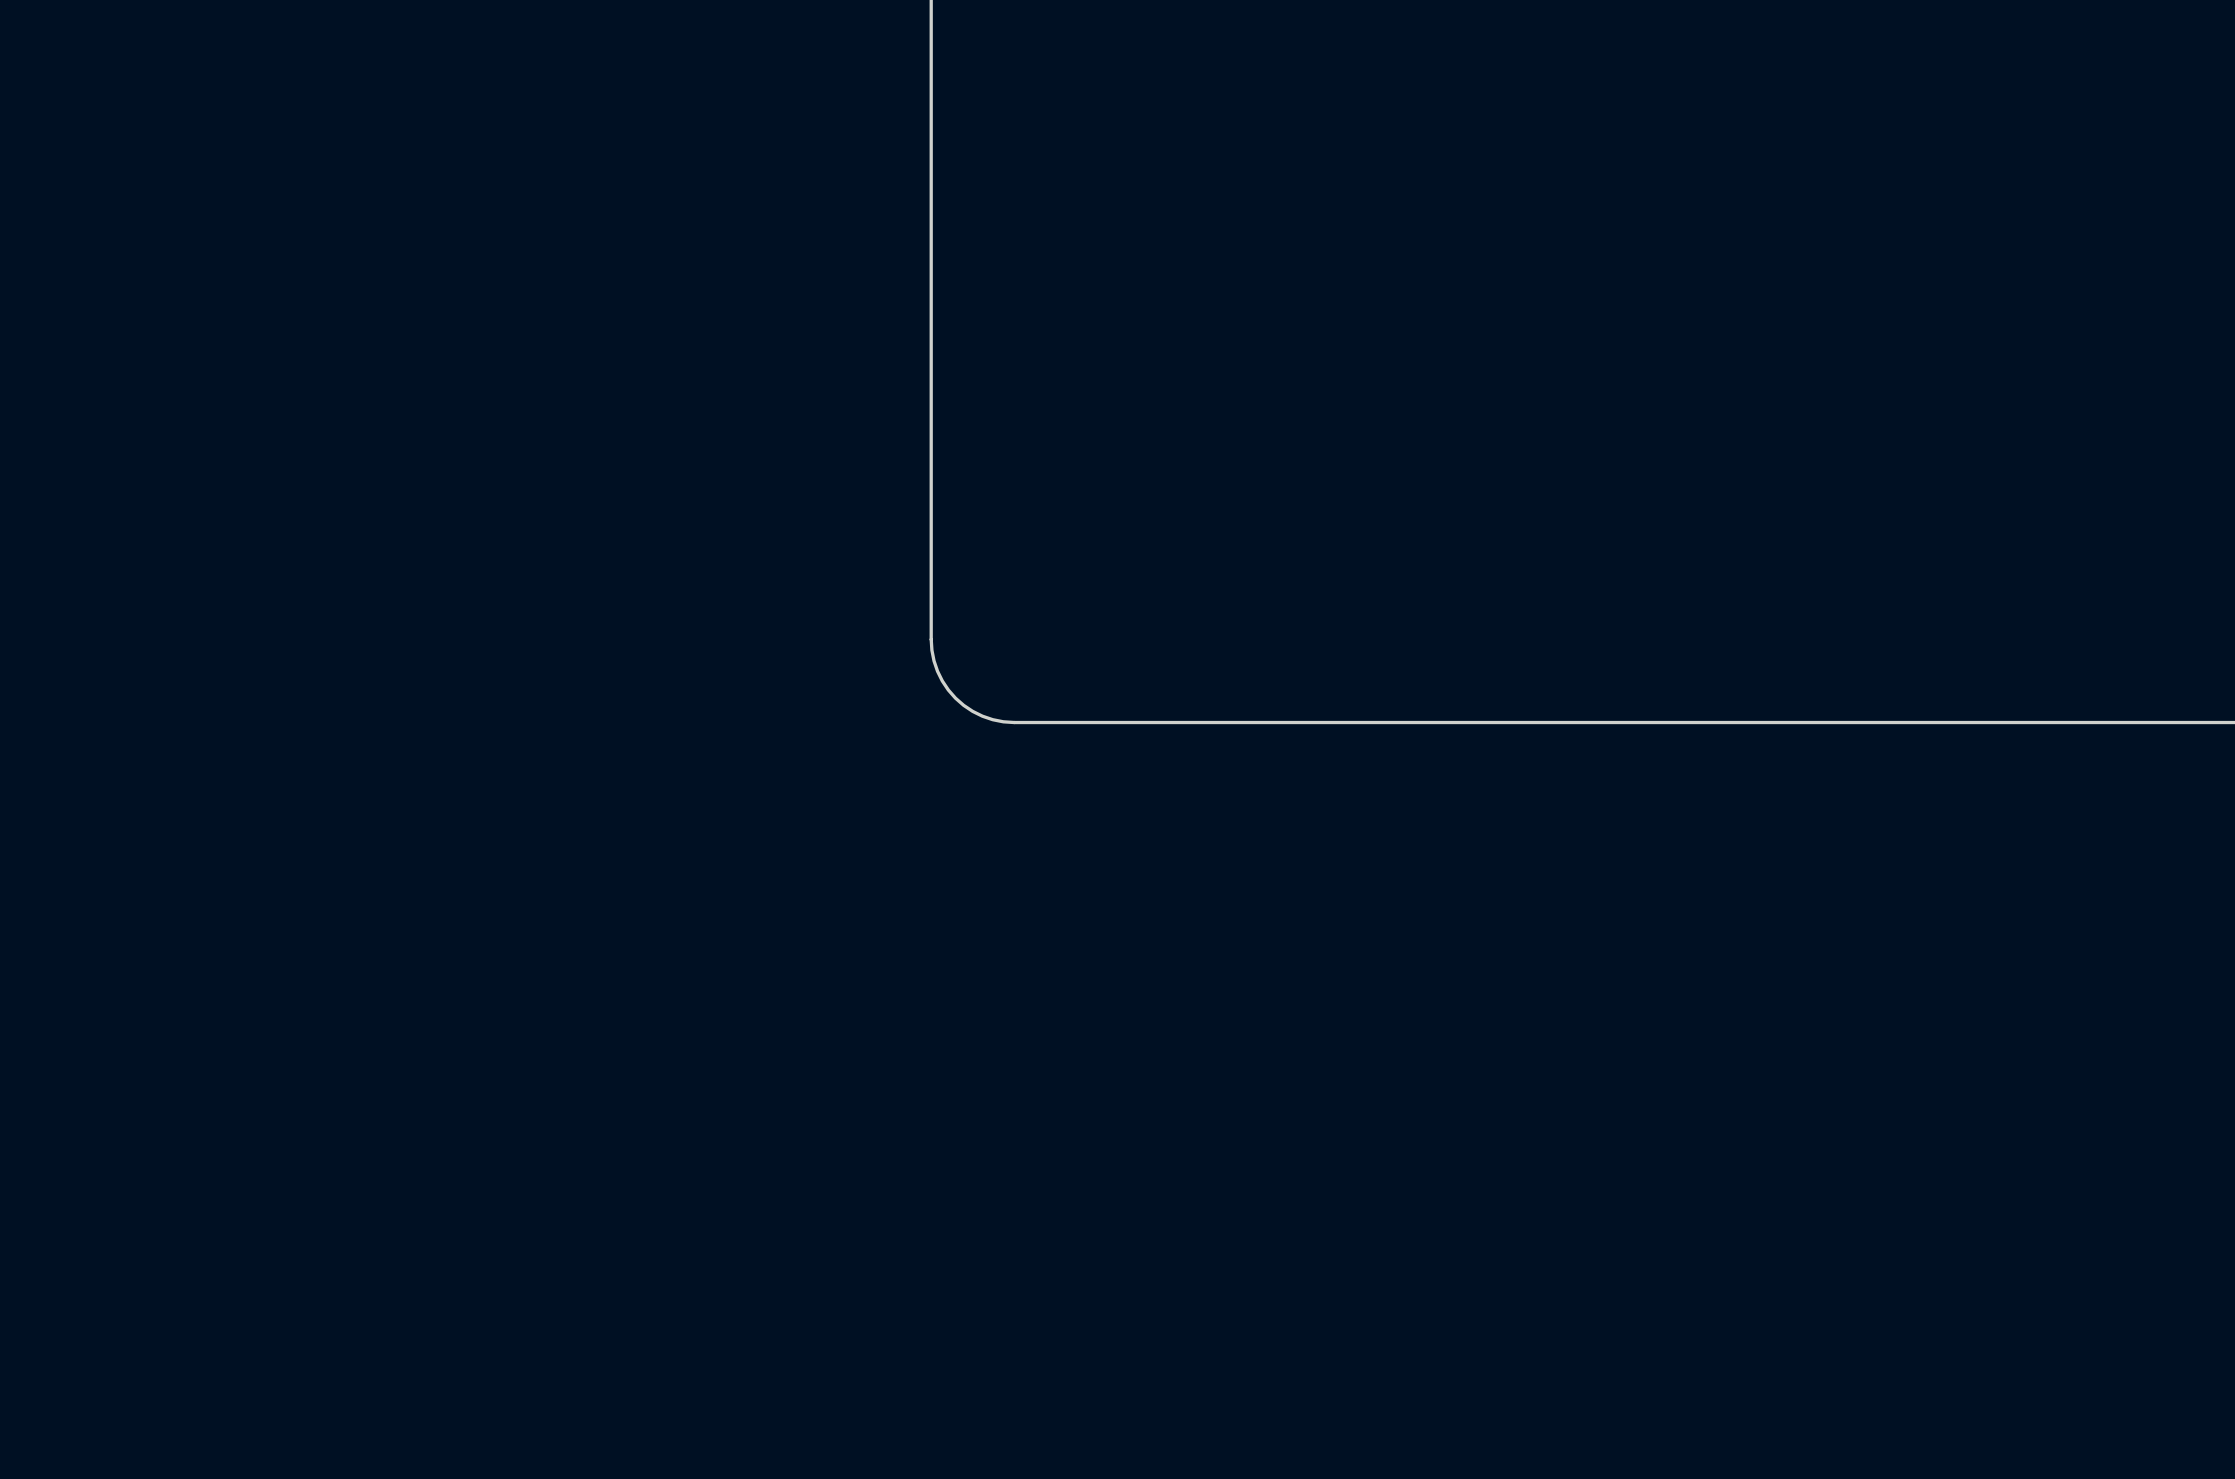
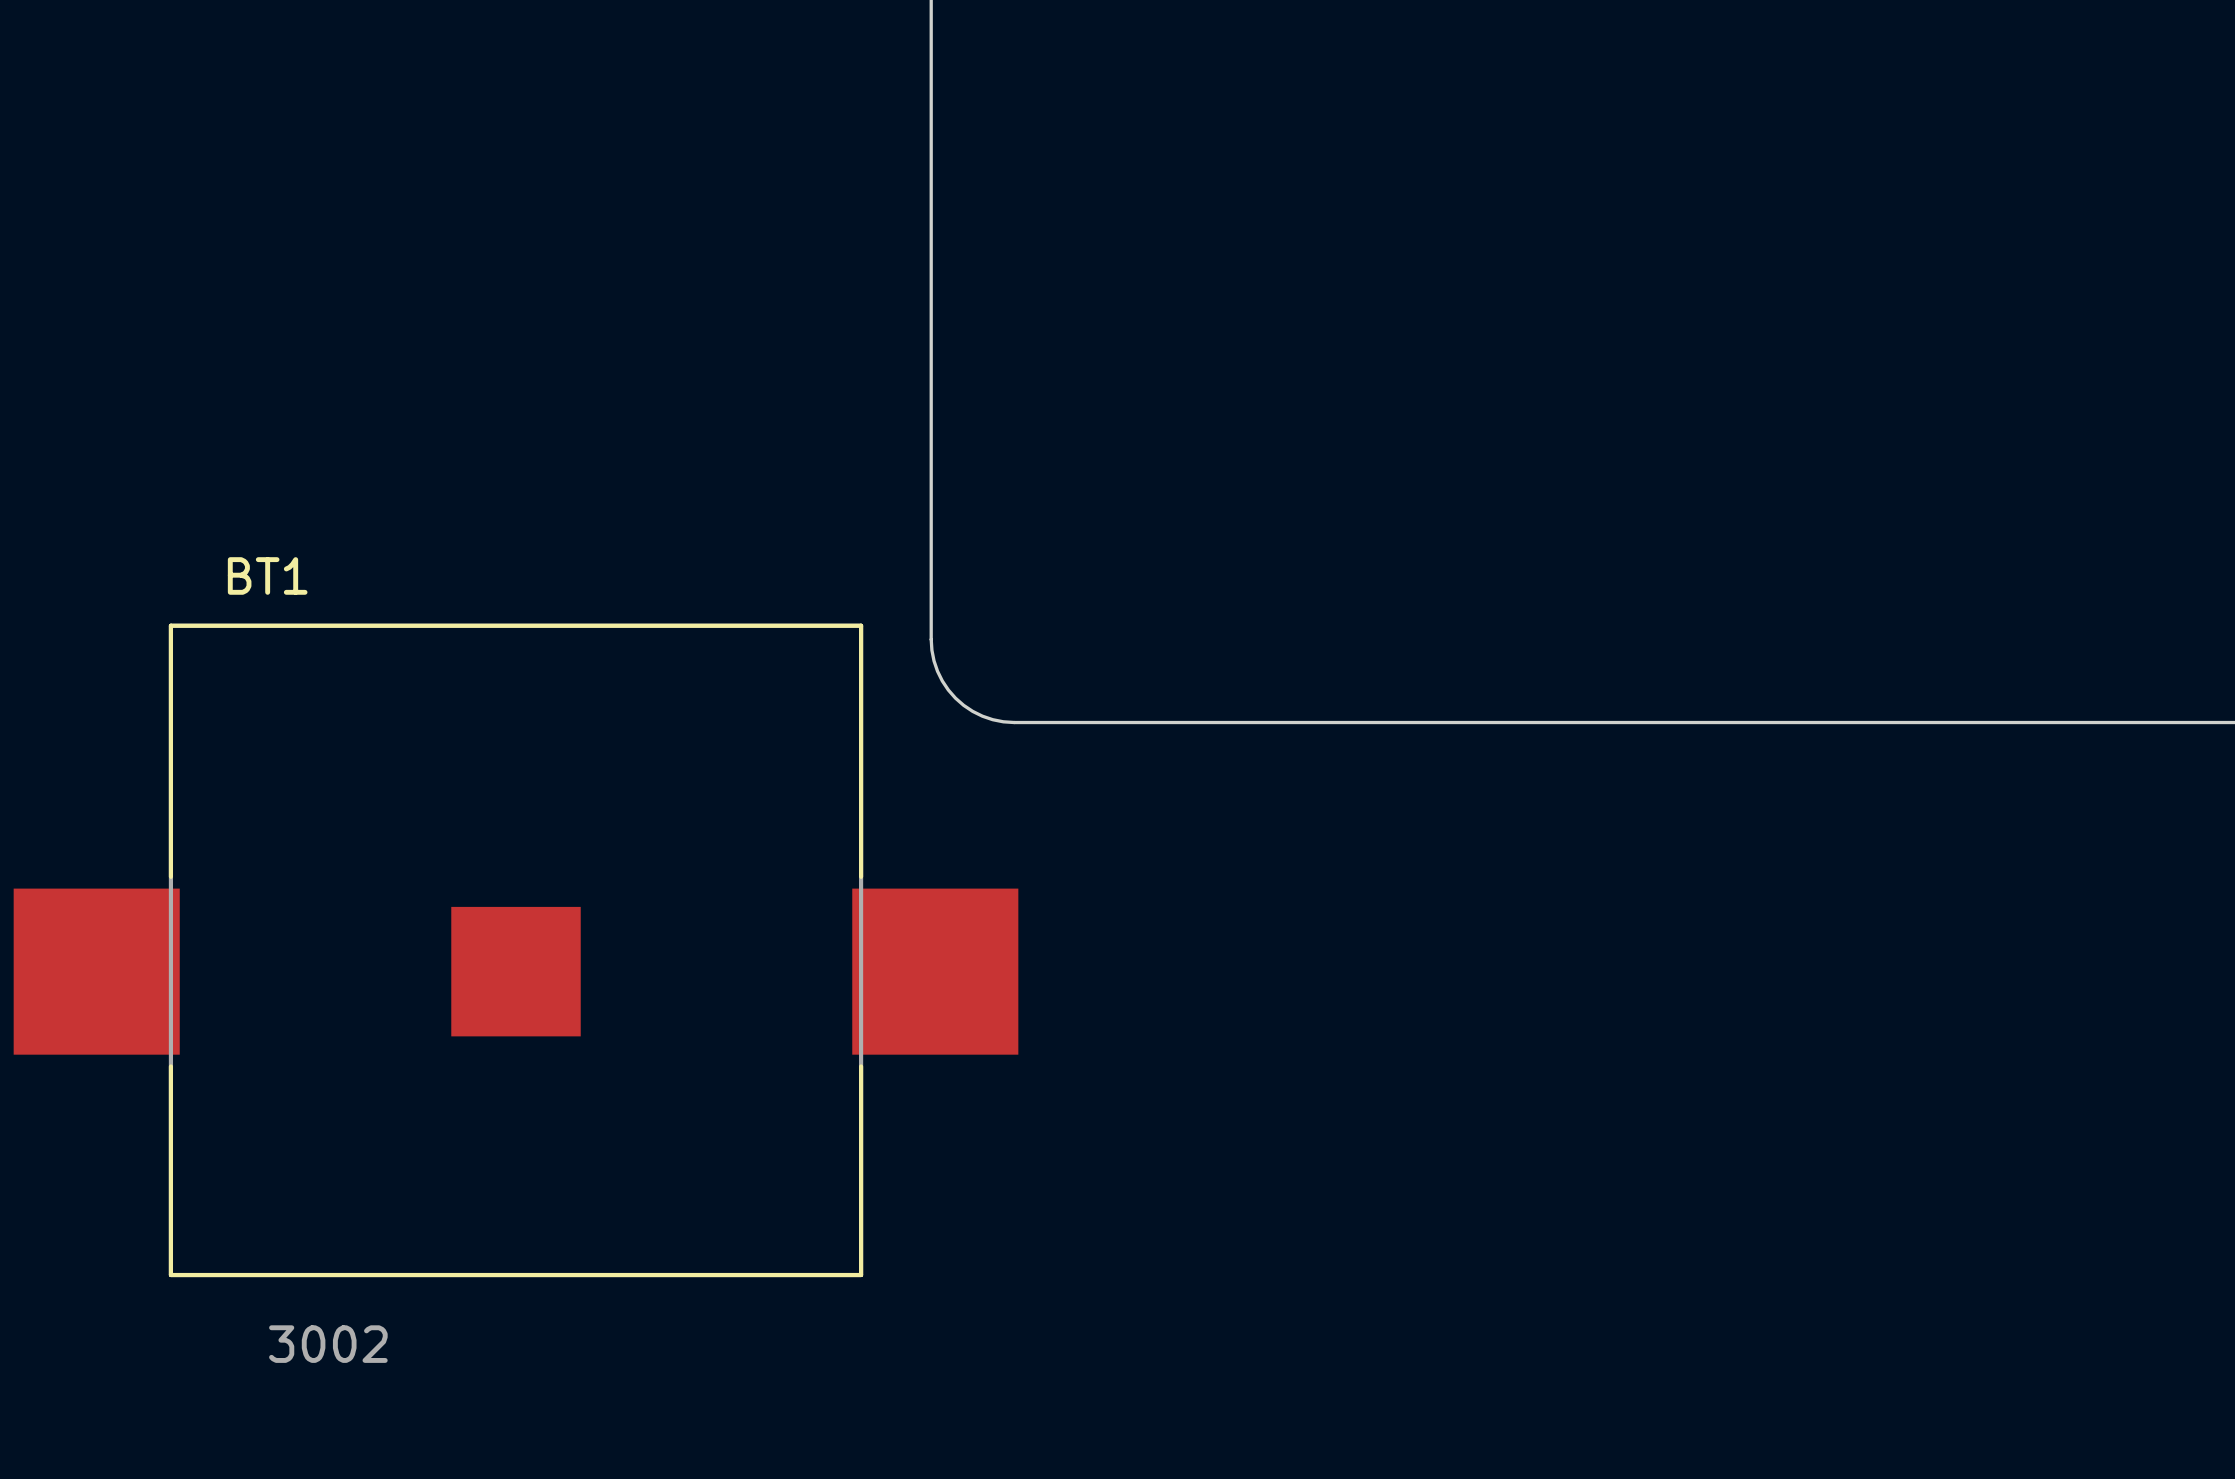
BT1: none -> 3002 (516, 950)

